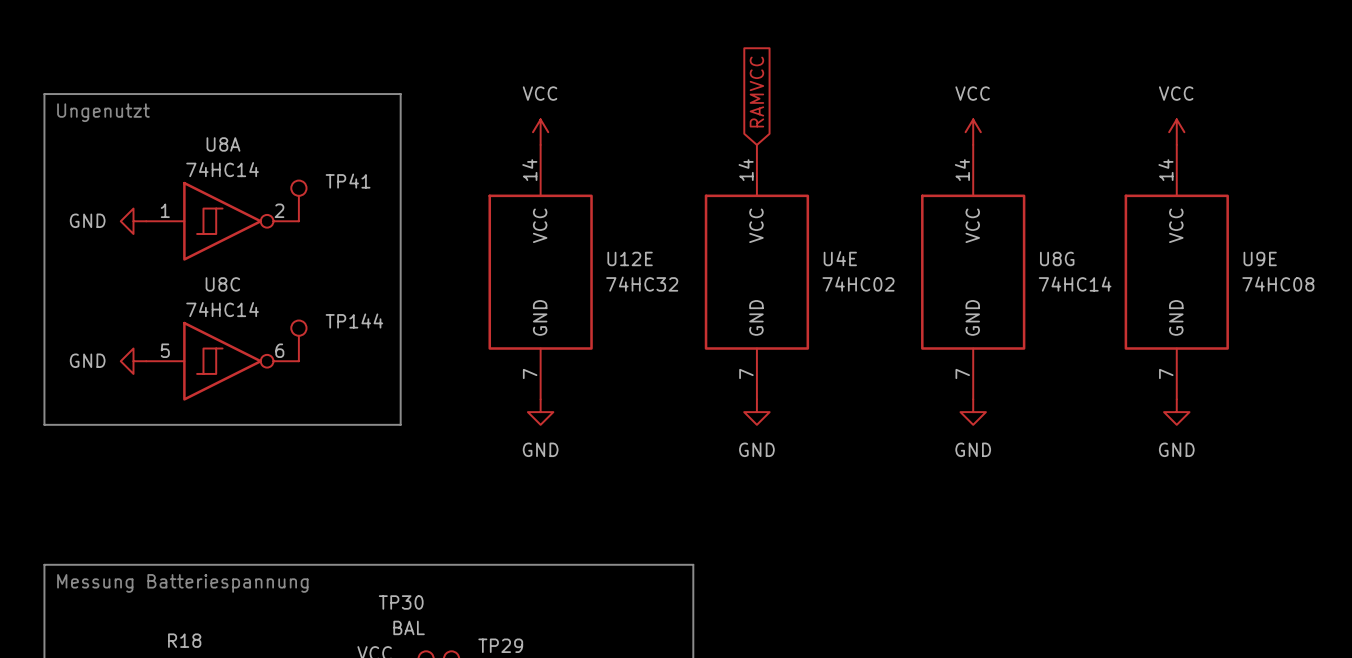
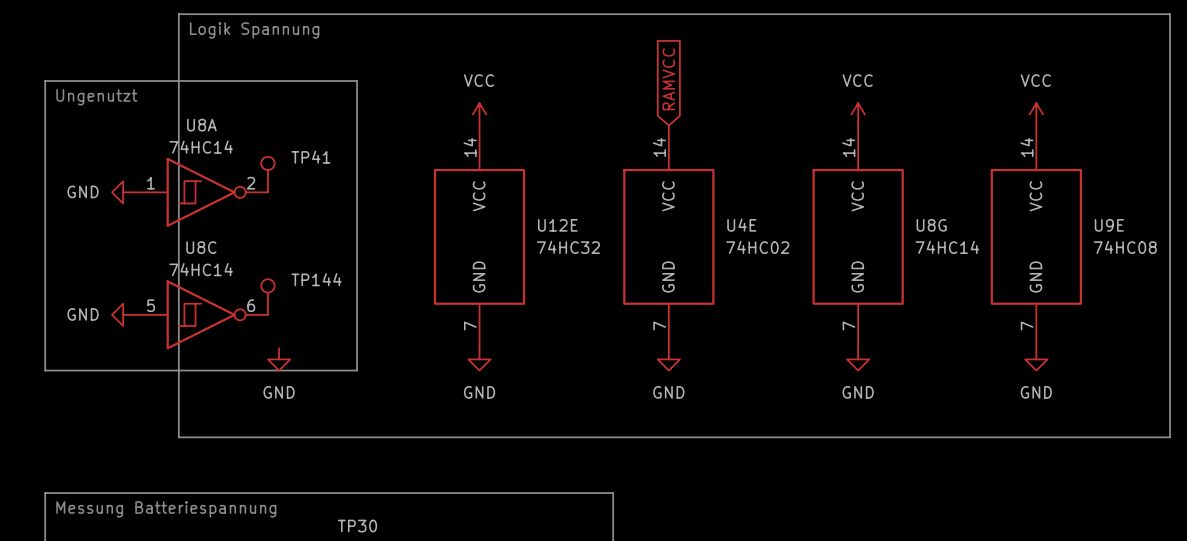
line: none -> (178, 14) (1169, 14) (1169, 437) (178, 437) (178, 14)
text: none -> Logik Spannung (254, 30)
power symbol: none -> GND (279, 359)

